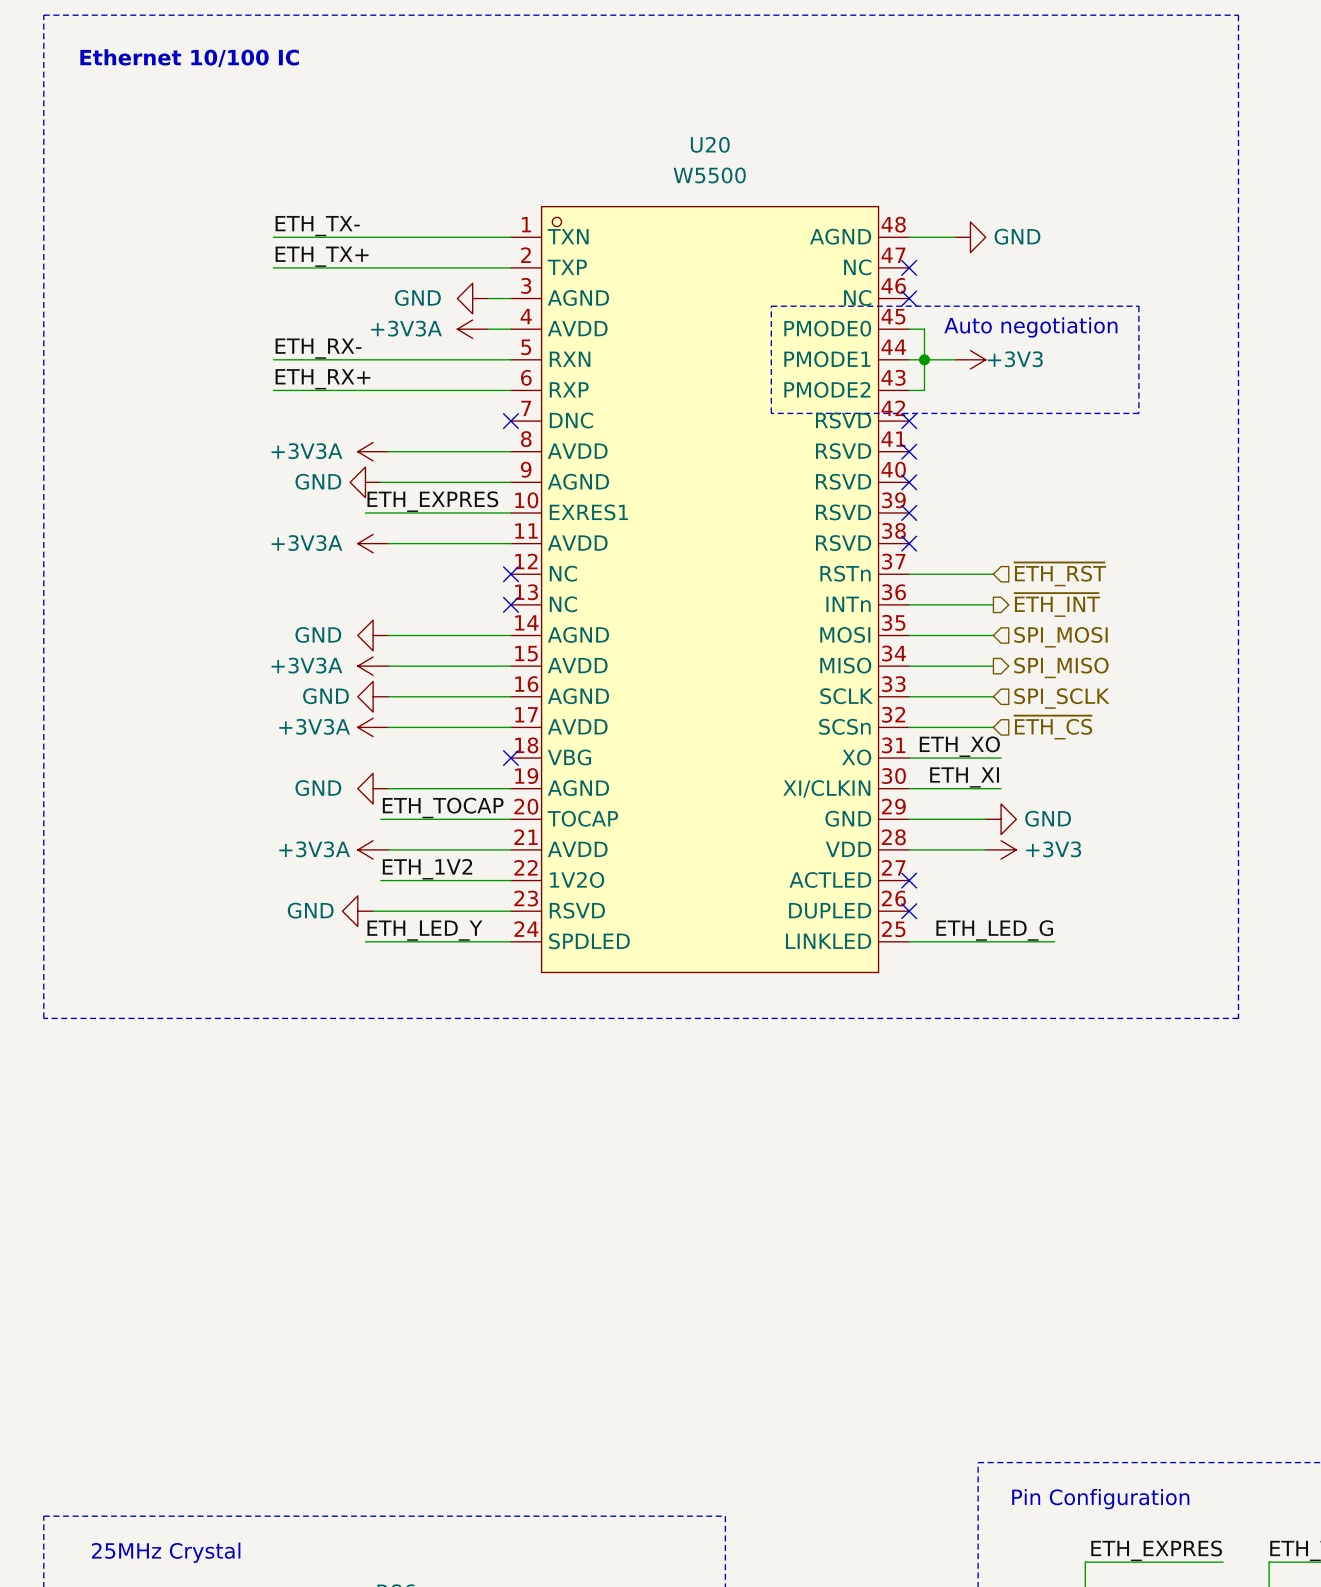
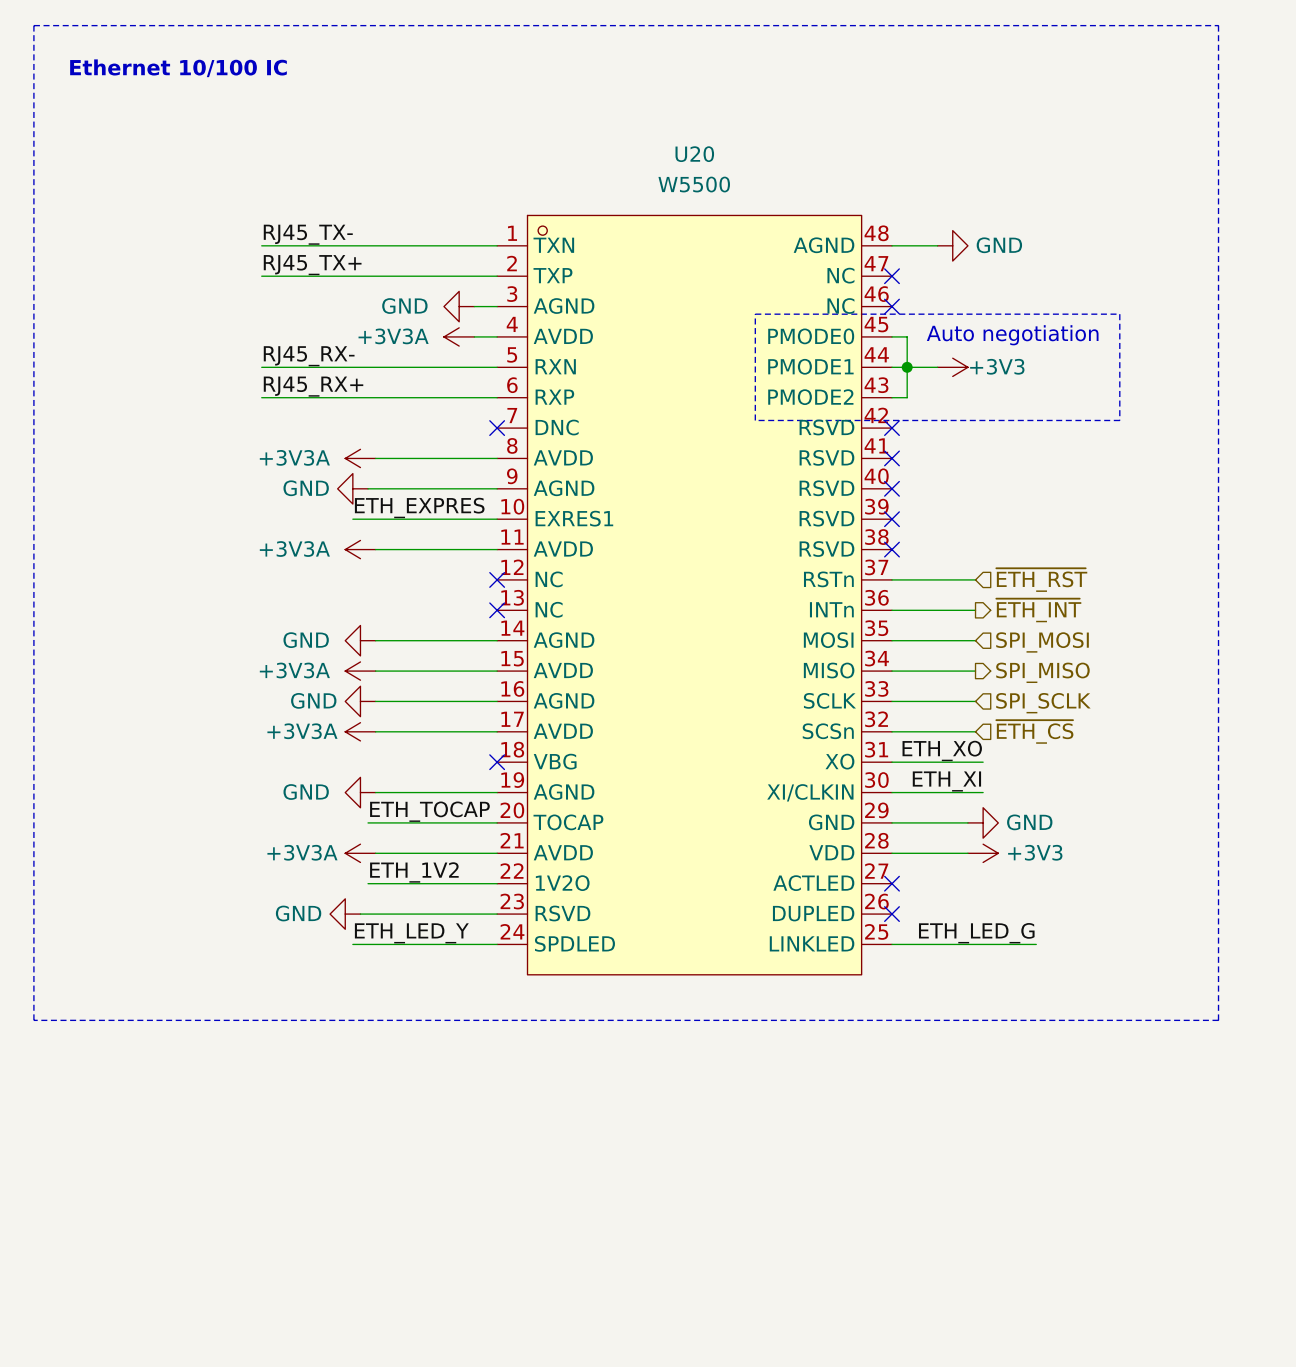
label: ETH_TX- (317, 226) -> RJ45_TX- (308, 234)
label: ETH_TX+ (322, 256) -> RJ45_TX+ (312, 265)
label: ETH_RX- (318, 348) -> RJ45_RX- (309, 356)
label: ETH_RX+ (322, 379) -> RJ45_RX+ (313, 386)

